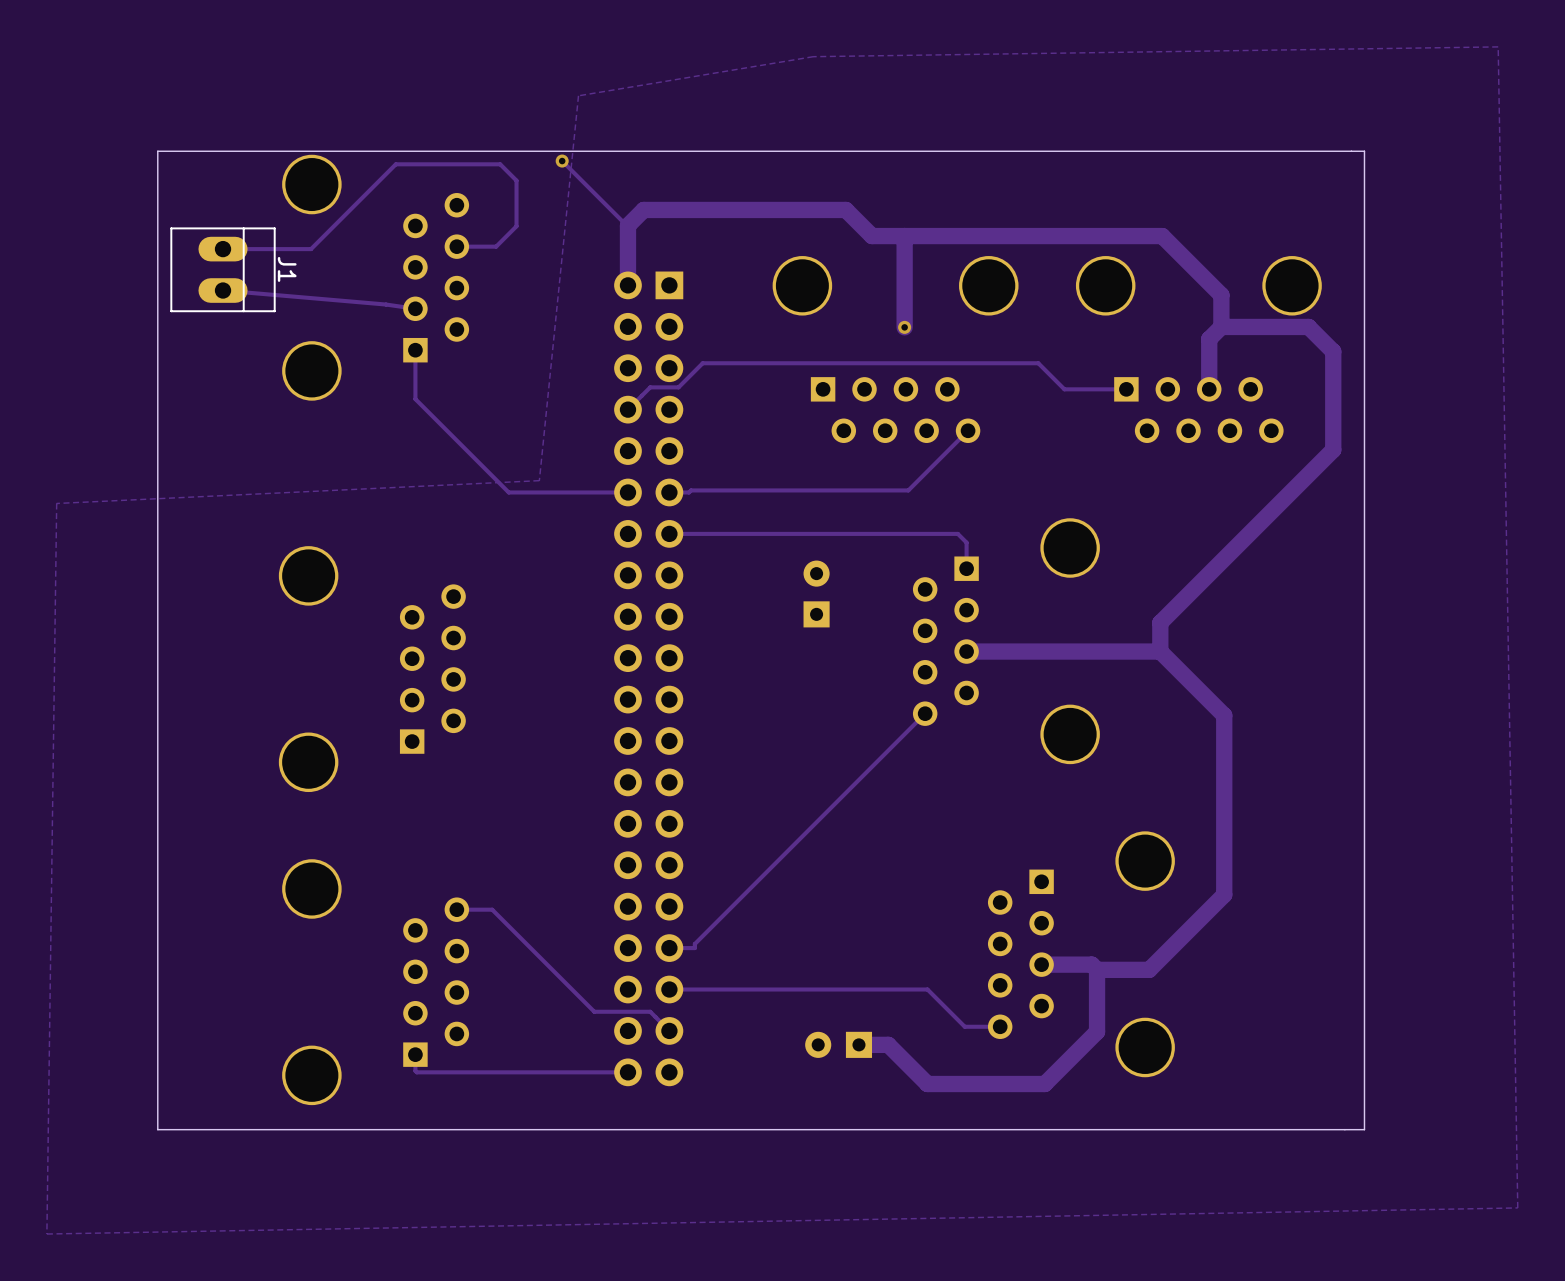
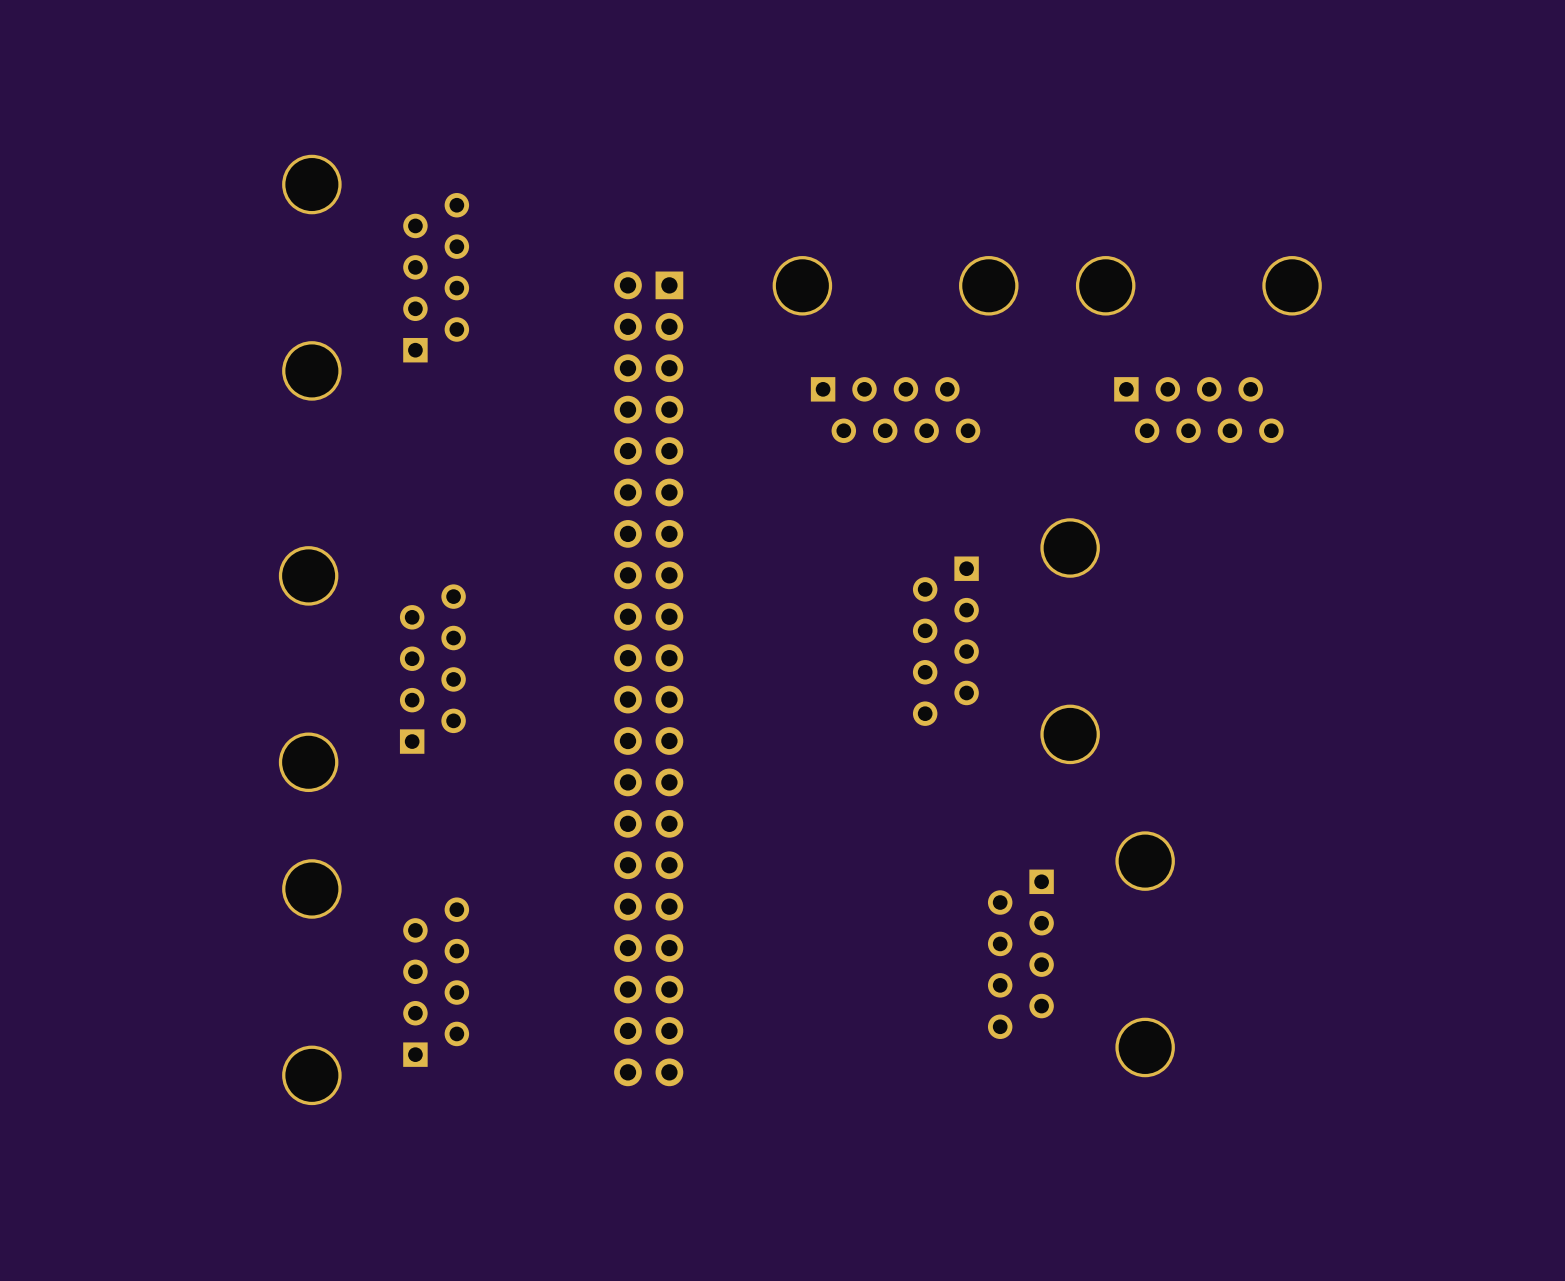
zone outline: (1498, 46) (1517, 1207) (46, 1234) (56, 503) (539, 480) (578, 95) (813, 56) (1498, 46) -> none
board edge: (1364, 151) (157, 151) (157, 1129) (1364, 1129) (1364, 151) -> none
track: (562, 161) (627, 225) -> none
via: (562, 161) -> none
track: (627, 225) (627, 285) -> none
track: (627, 225) (643, 209) (845, 209) (872, 236) (1162, 236) (1221, 295) (1221, 326) -> none
track: (904, 236) (904, 327) -> none
track: (456, 246) (496, 246) (516, 226) (516, 180) (500, 164) (395, 164) (311, 249) (223, 249) -> none
J1: (223, 269) -> none
track: (223, 290) (415, 308) -> none
track: (1221, 326) (1308, 326) (1333, 351) (1333, 449) (1160, 622) (1160, 651) -> none
track: (1221, 326) (1209, 339) (1209, 389) -> none
via: (904, 327) -> none
track: (415, 350) (415, 399) (508, 492) (627, 492) -> none
track: (1126, 389) (1064, 389) (1038, 363) (702, 363) (678, 387) (650, 387) (627, 409) -> none
track: (968, 430) (908, 490) (691, 490) (689, 492) (669, 492) -> none
track: (669, 533) (957, 533) (966, 542) (966, 568) -> none
part: (816, 593) -> none
track: (1160, 651) (966, 651) -> none
track: (1160, 651) (1224, 715) (1224, 894) (1149, 969) (1097, 969) -> none
track: (925, 713) (694, 944) (694, 948) (669, 948) -> none
track: (456, 909) (492, 909) (594, 1011) (650, 1011) (669, 1030) -> none
track: (1041, 964) (1091, 964) (1097, 969) -> none
track: (1097, 969) (1097, 1031) (1044, 1084) (927, 1084) (888, 1044) (858, 1044) -> none
track: (669, 989) (927, 989) (964, 1026) (1000, 1026) -> none
part: (838, 1044) -> none
track: (415, 1054) (416, 1072) (627, 1072) -> none

